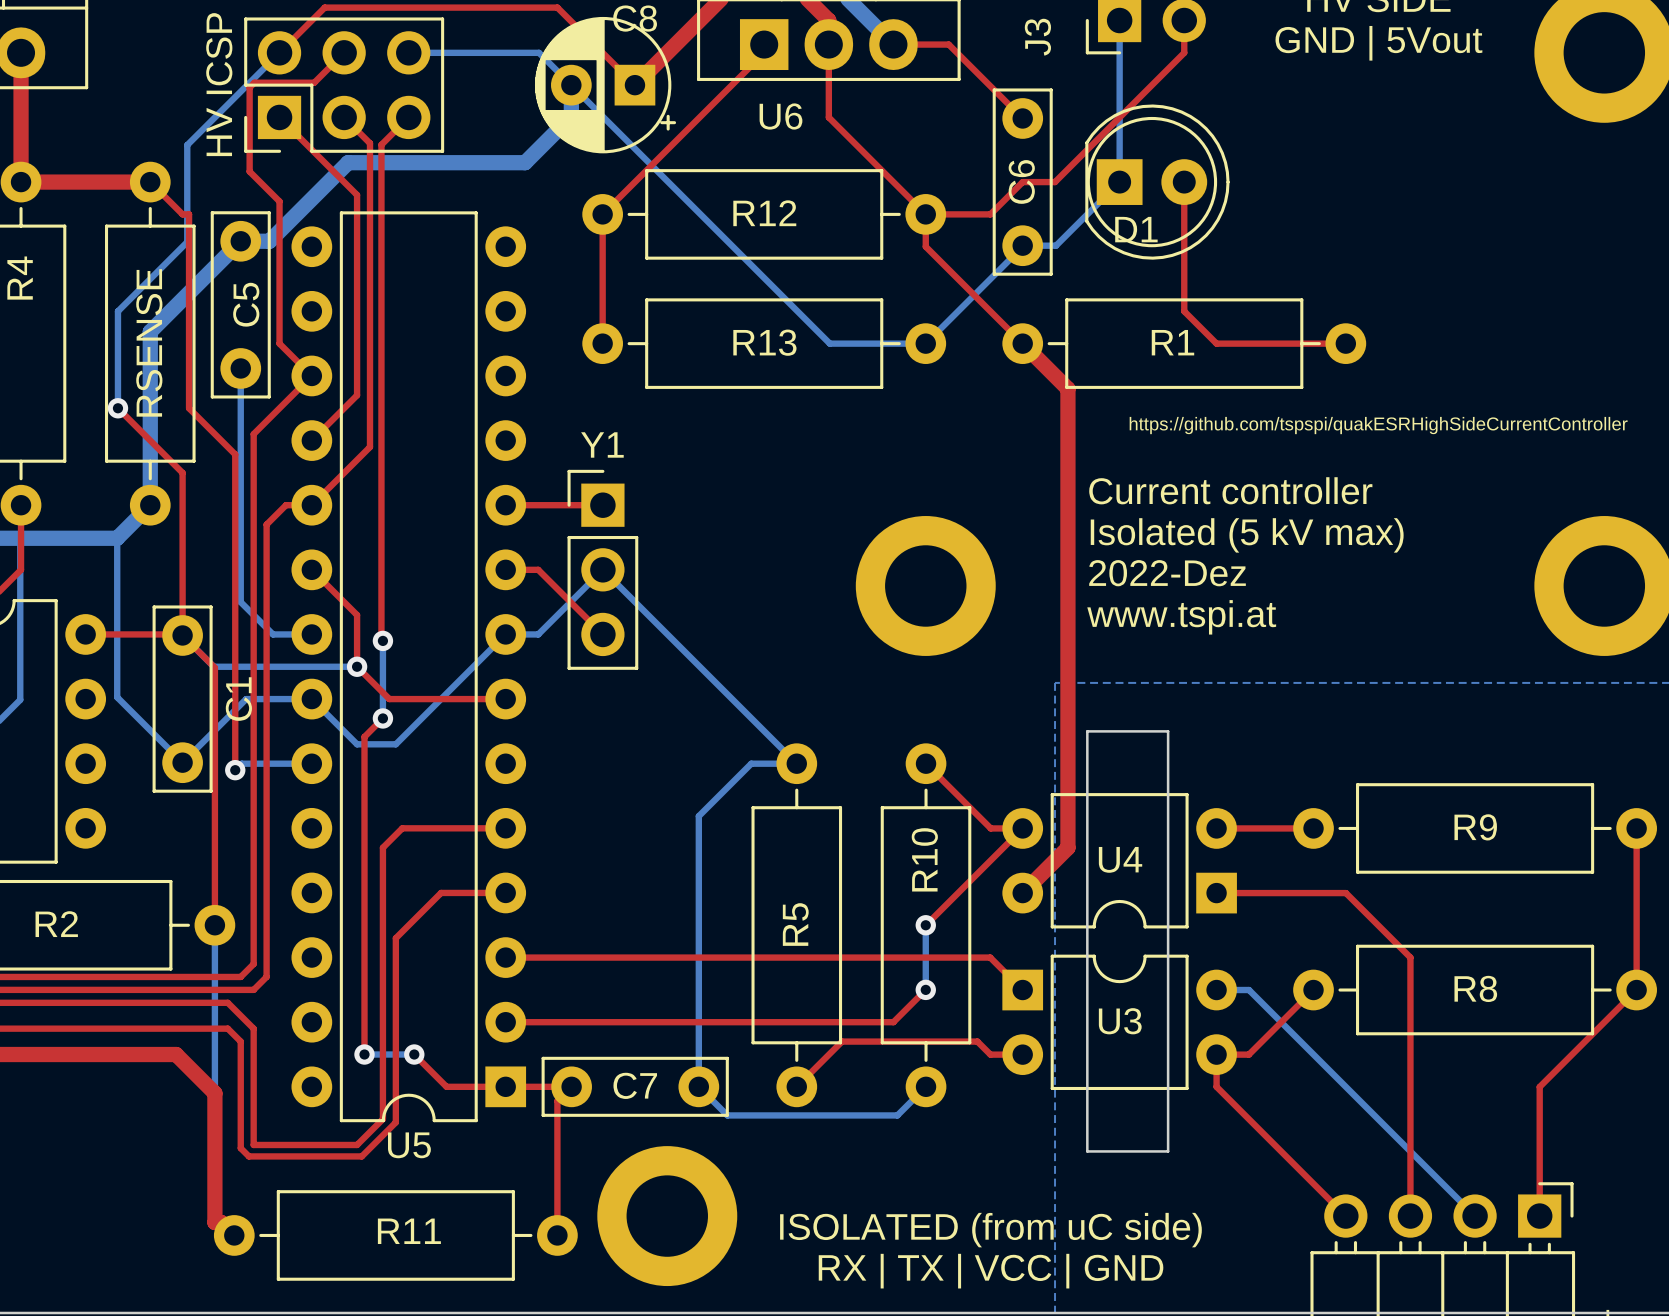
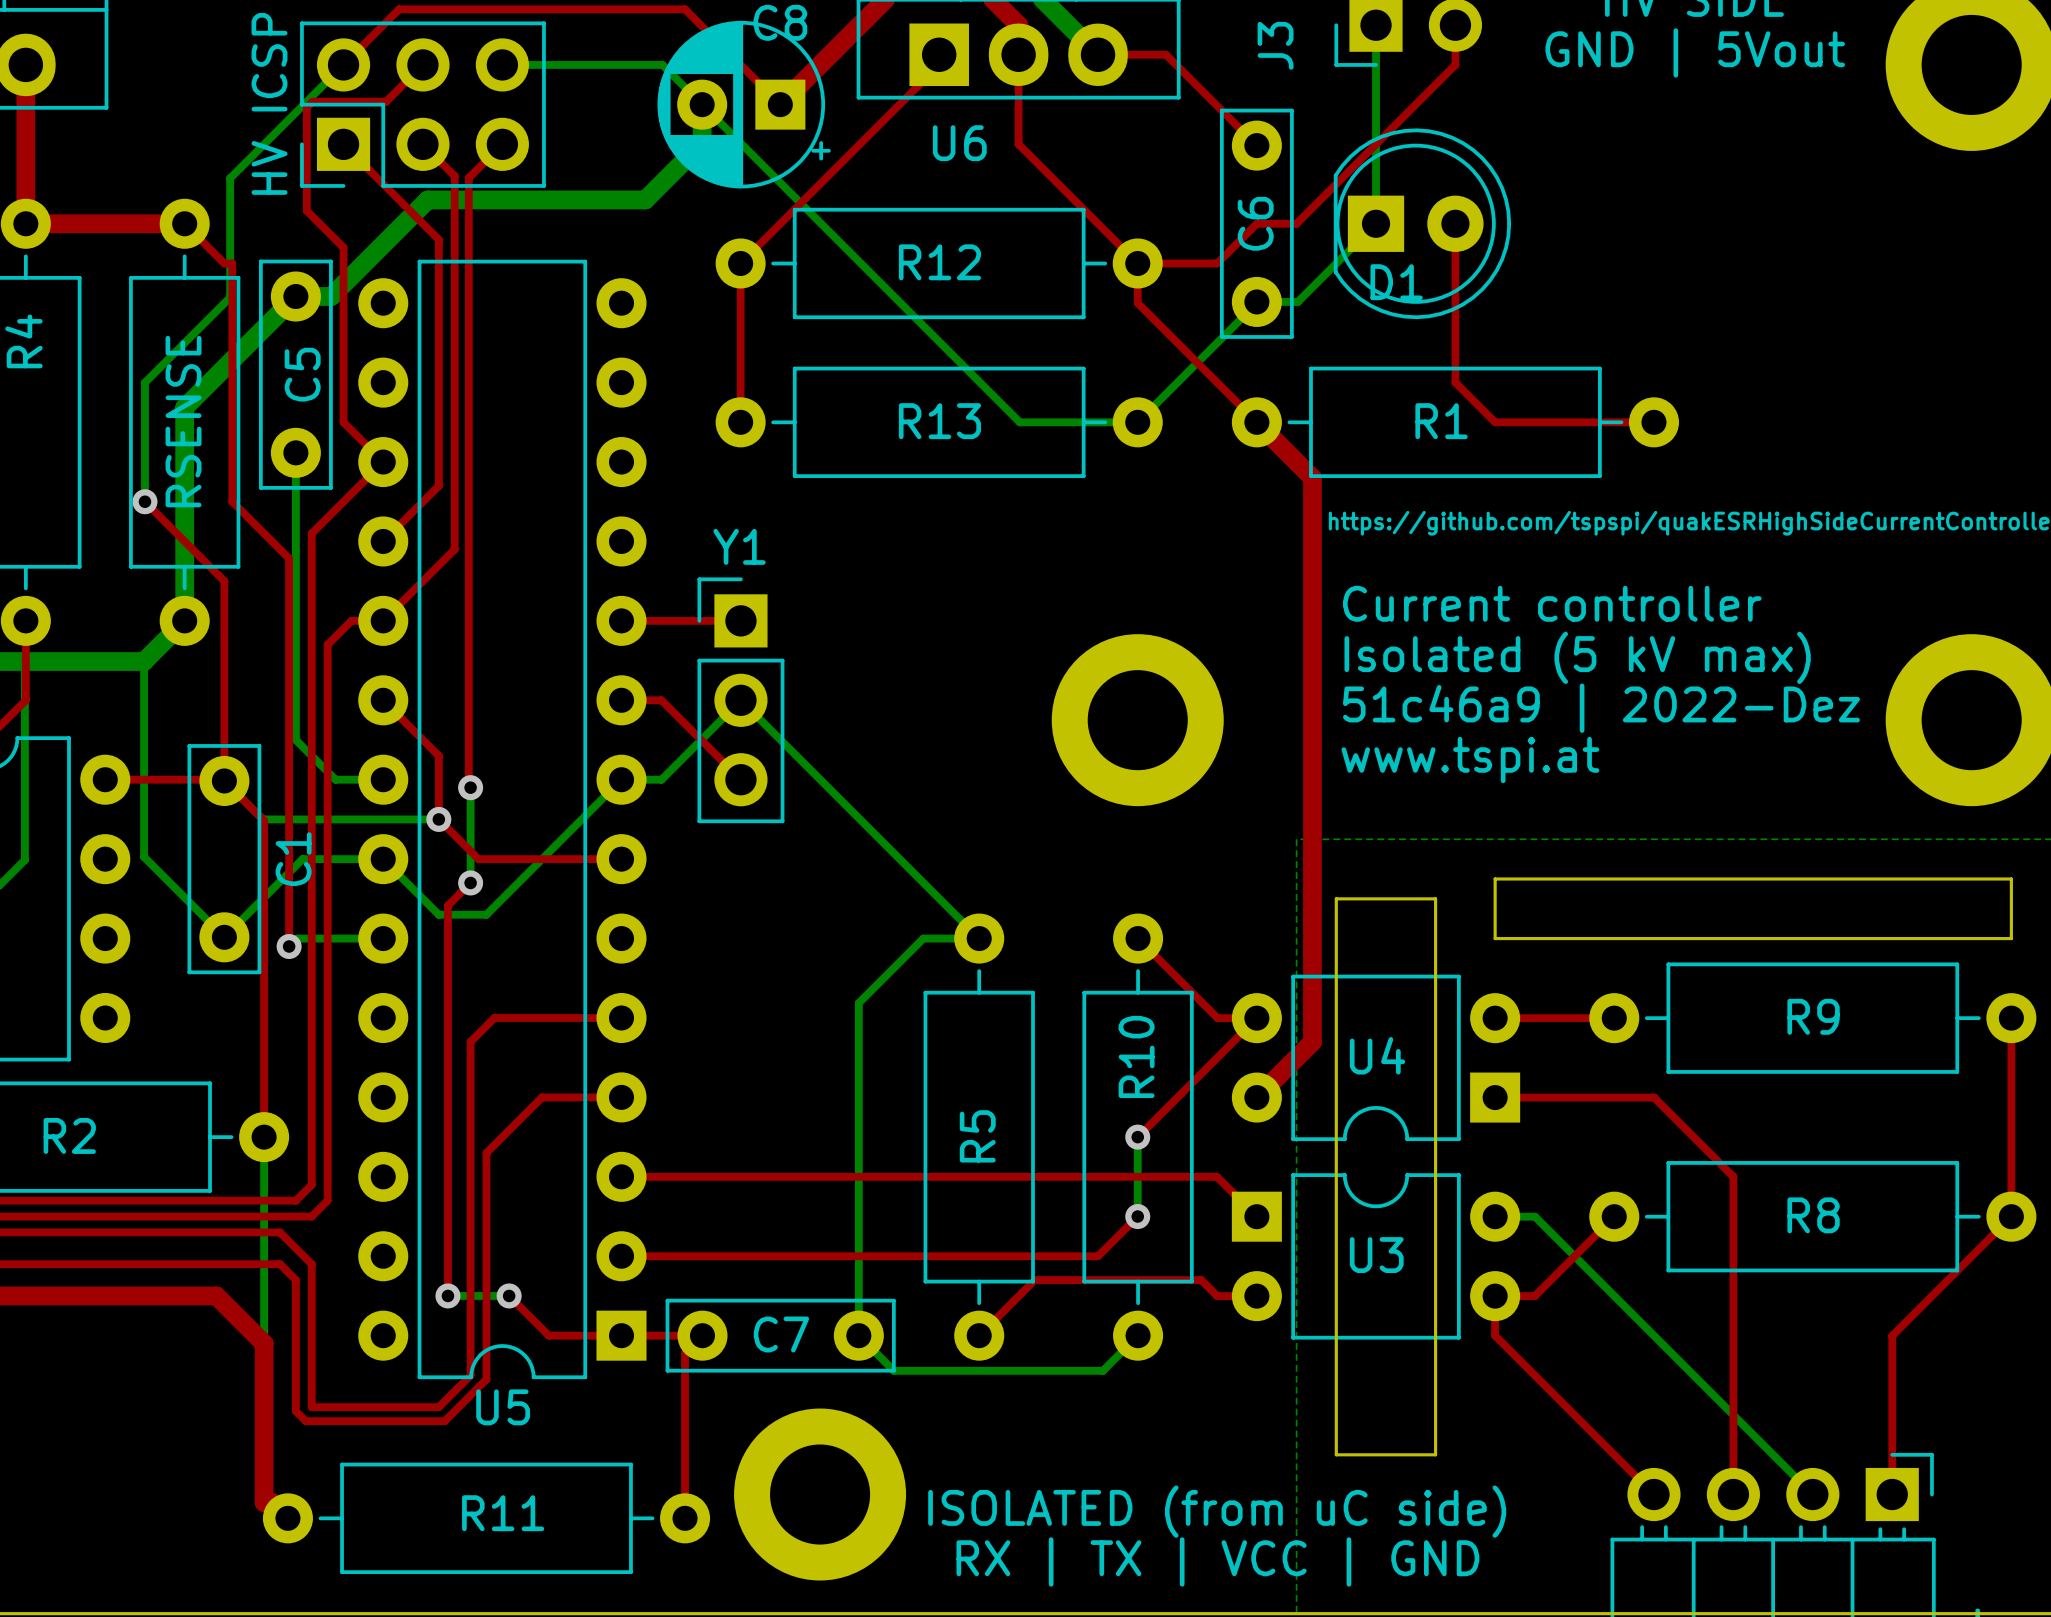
text: 2022-Dez (1167, 573) -> 51c46a9 | 2022-Dez (1601, 708)
board edge: none -> (1495, 879) (2011, 879) (2011, 938) (1495, 938) (1495, 879)
board edge: (1087, 1151) (1168, 1151) -> (1336, 1415) (1336, 1454) (1435, 1454) (1435, 1415)

